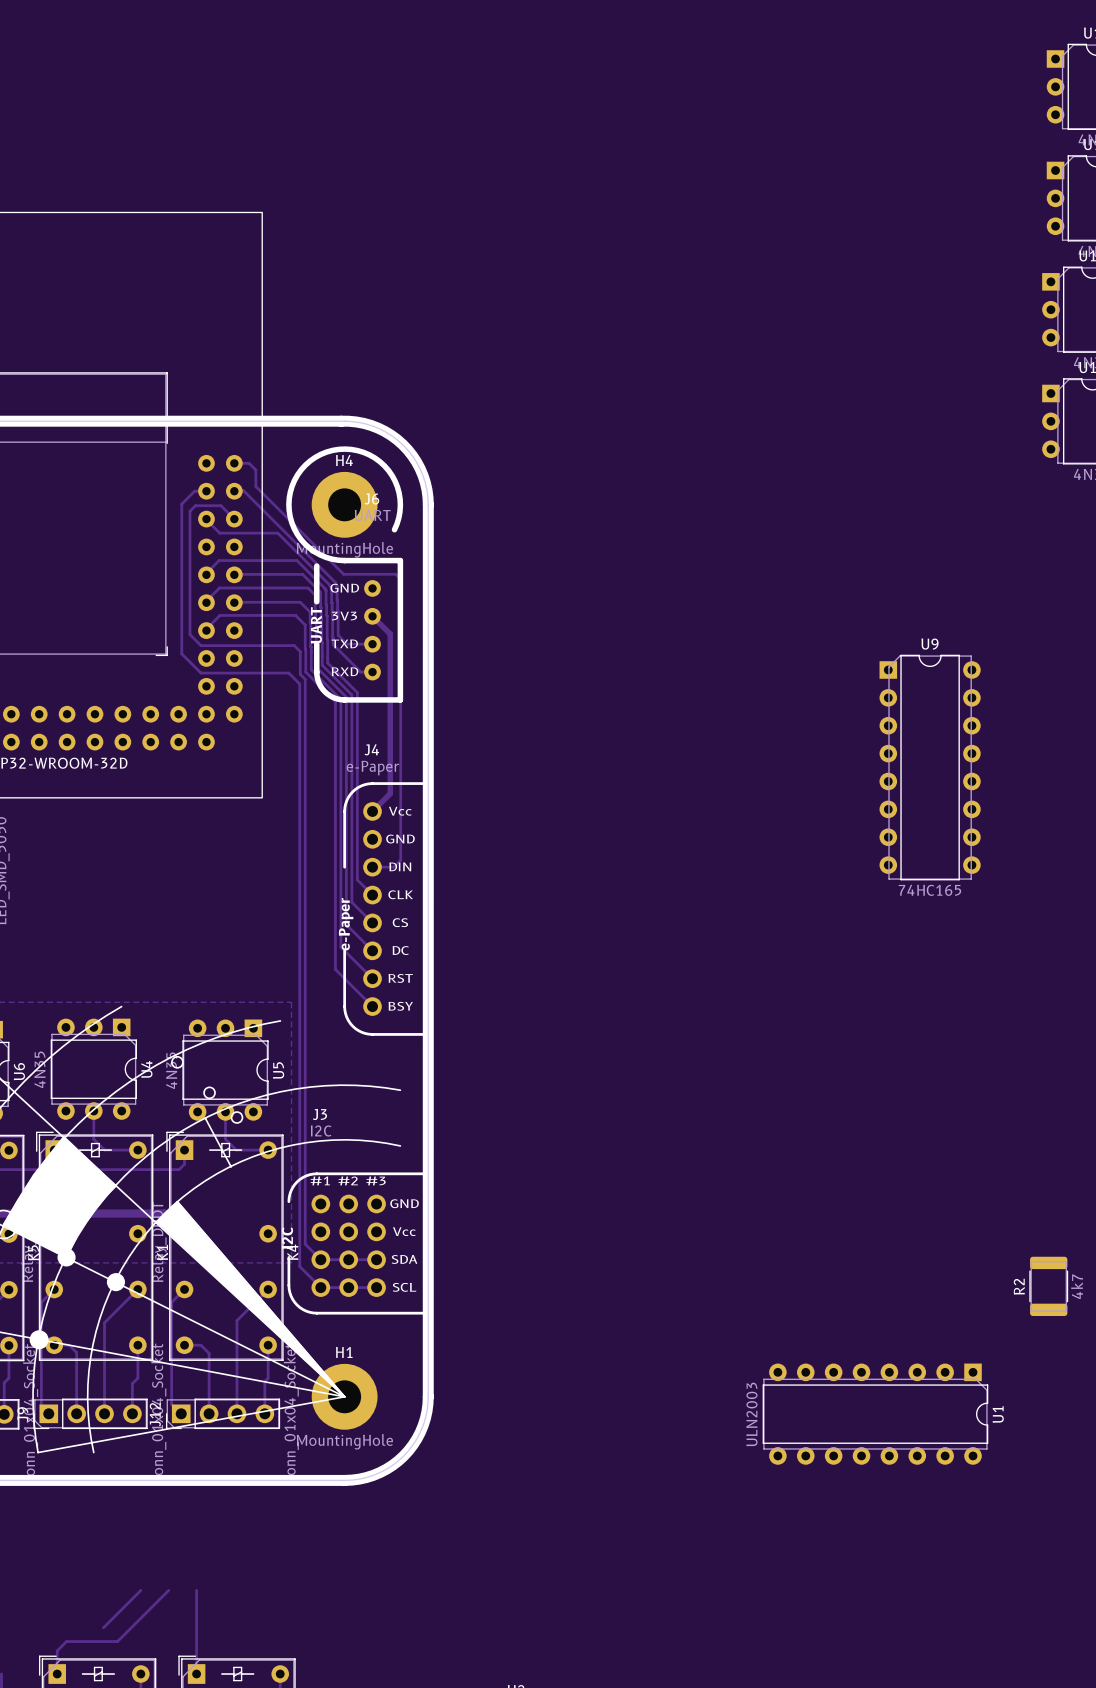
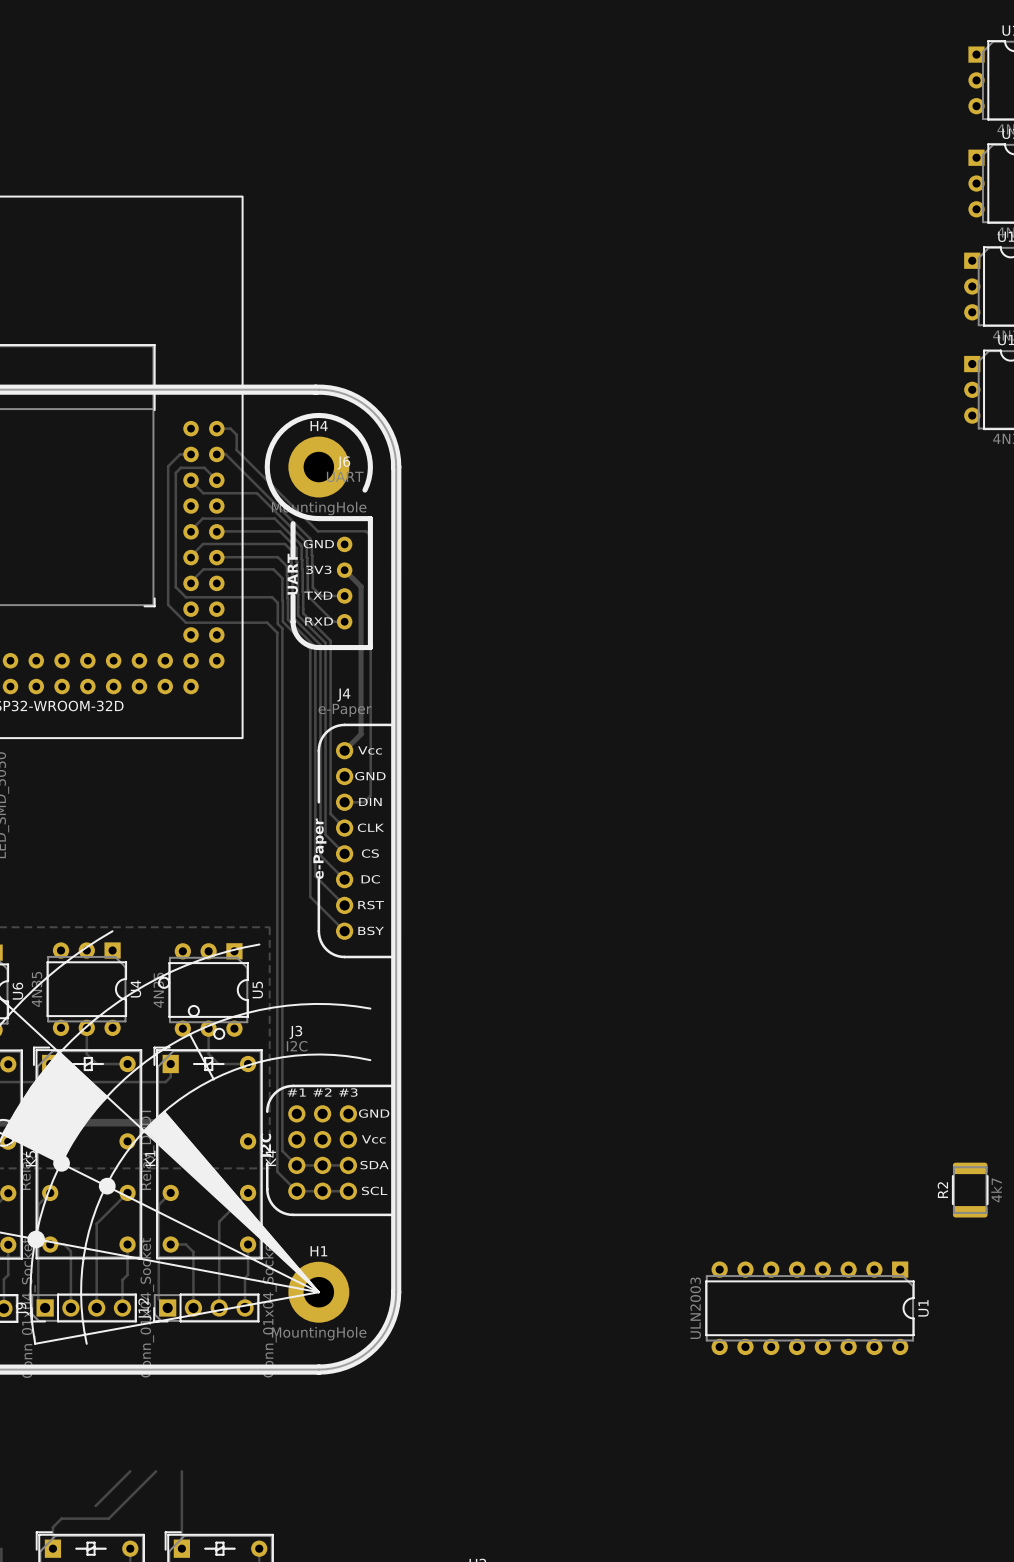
U9: 74HC165 (930, 767) -> none

